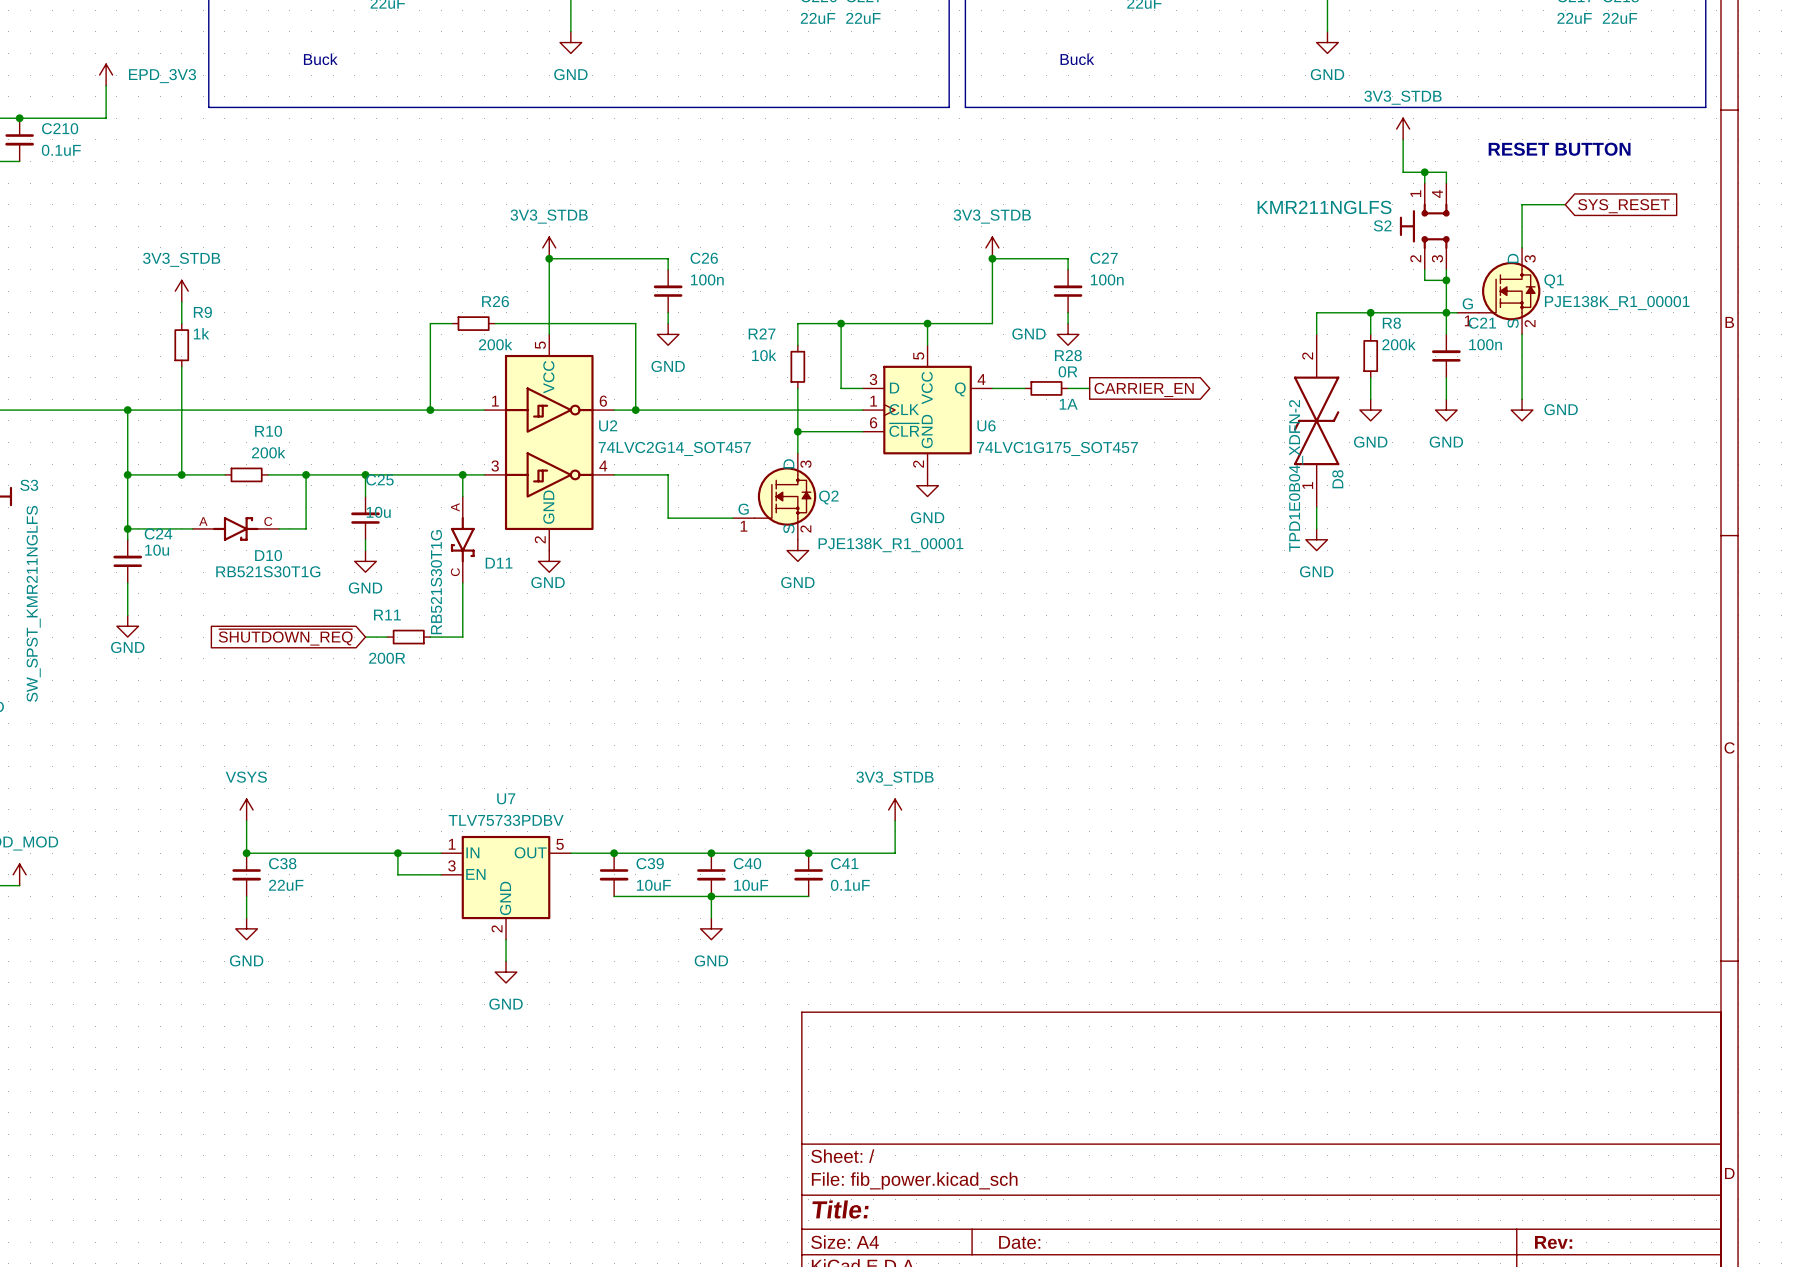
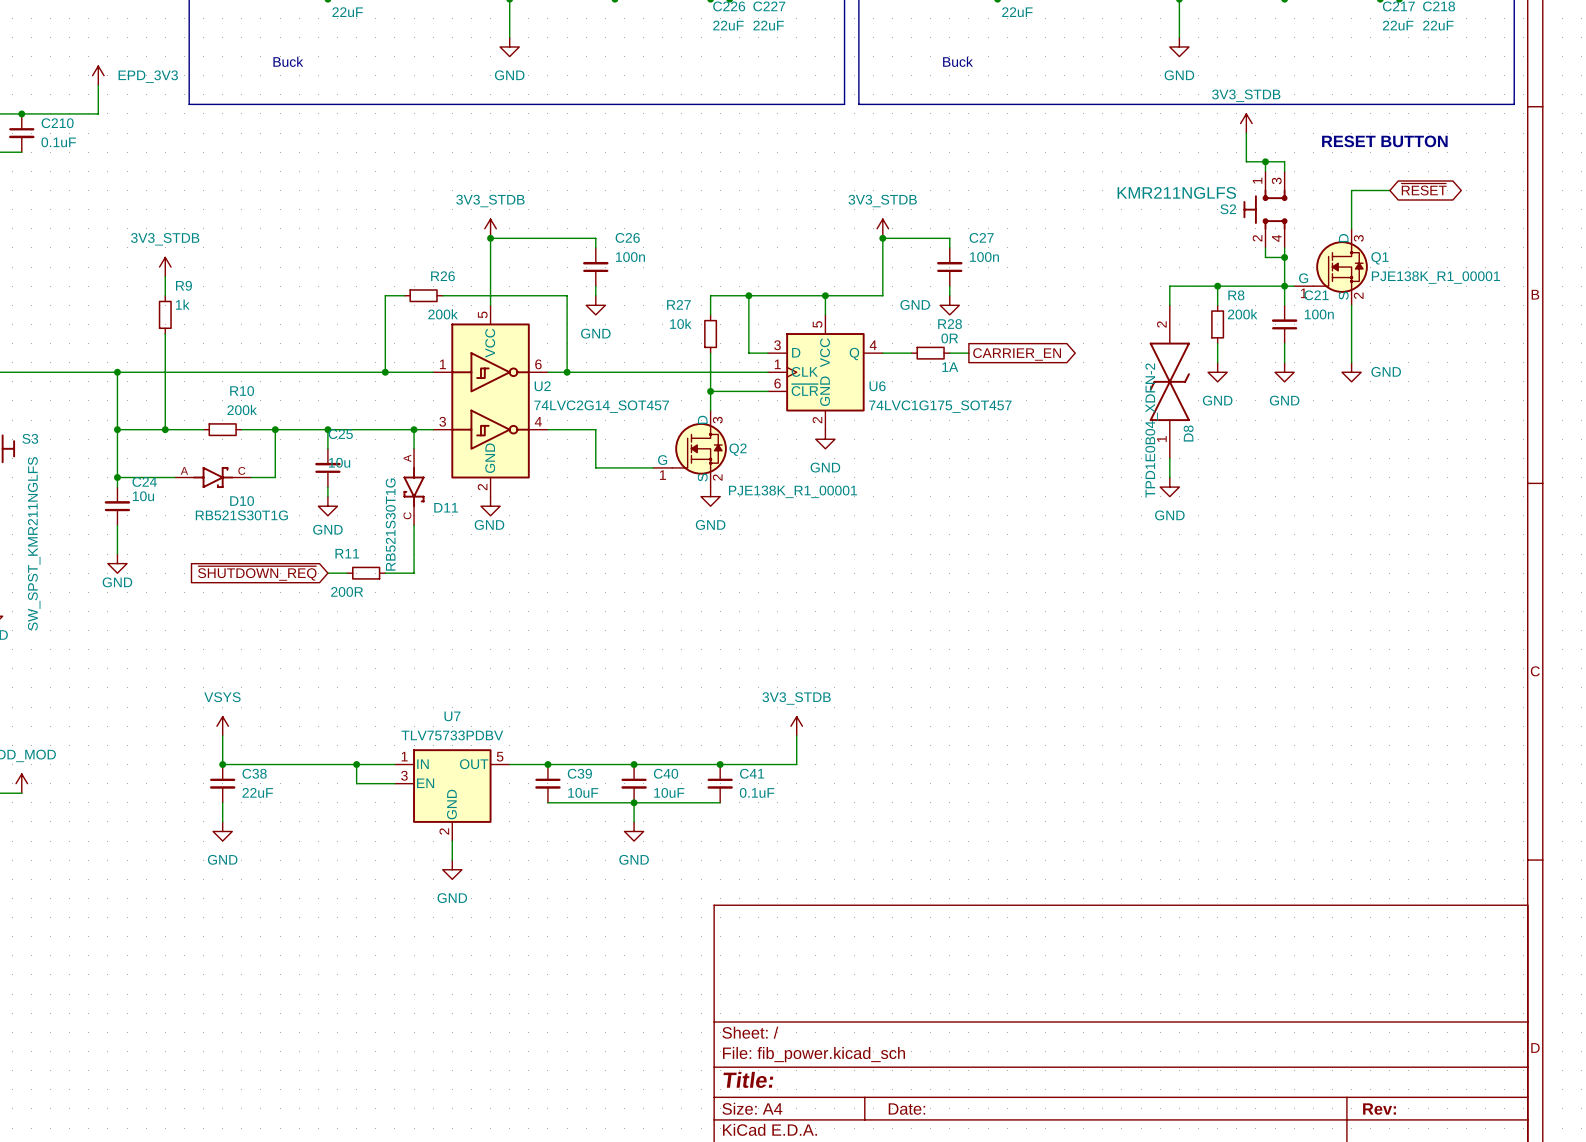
S2 pin number: 4 (1437, 193) -> 3 (1276, 180)
global label shape: input (1623, 206) -> bidirectional (1424, 189)
global label: SYS_RESET (1623, 206) -> ~{RESET} (1424, 189)
S2 pin number: 3 (1437, 258) -> 4 (1276, 238)

